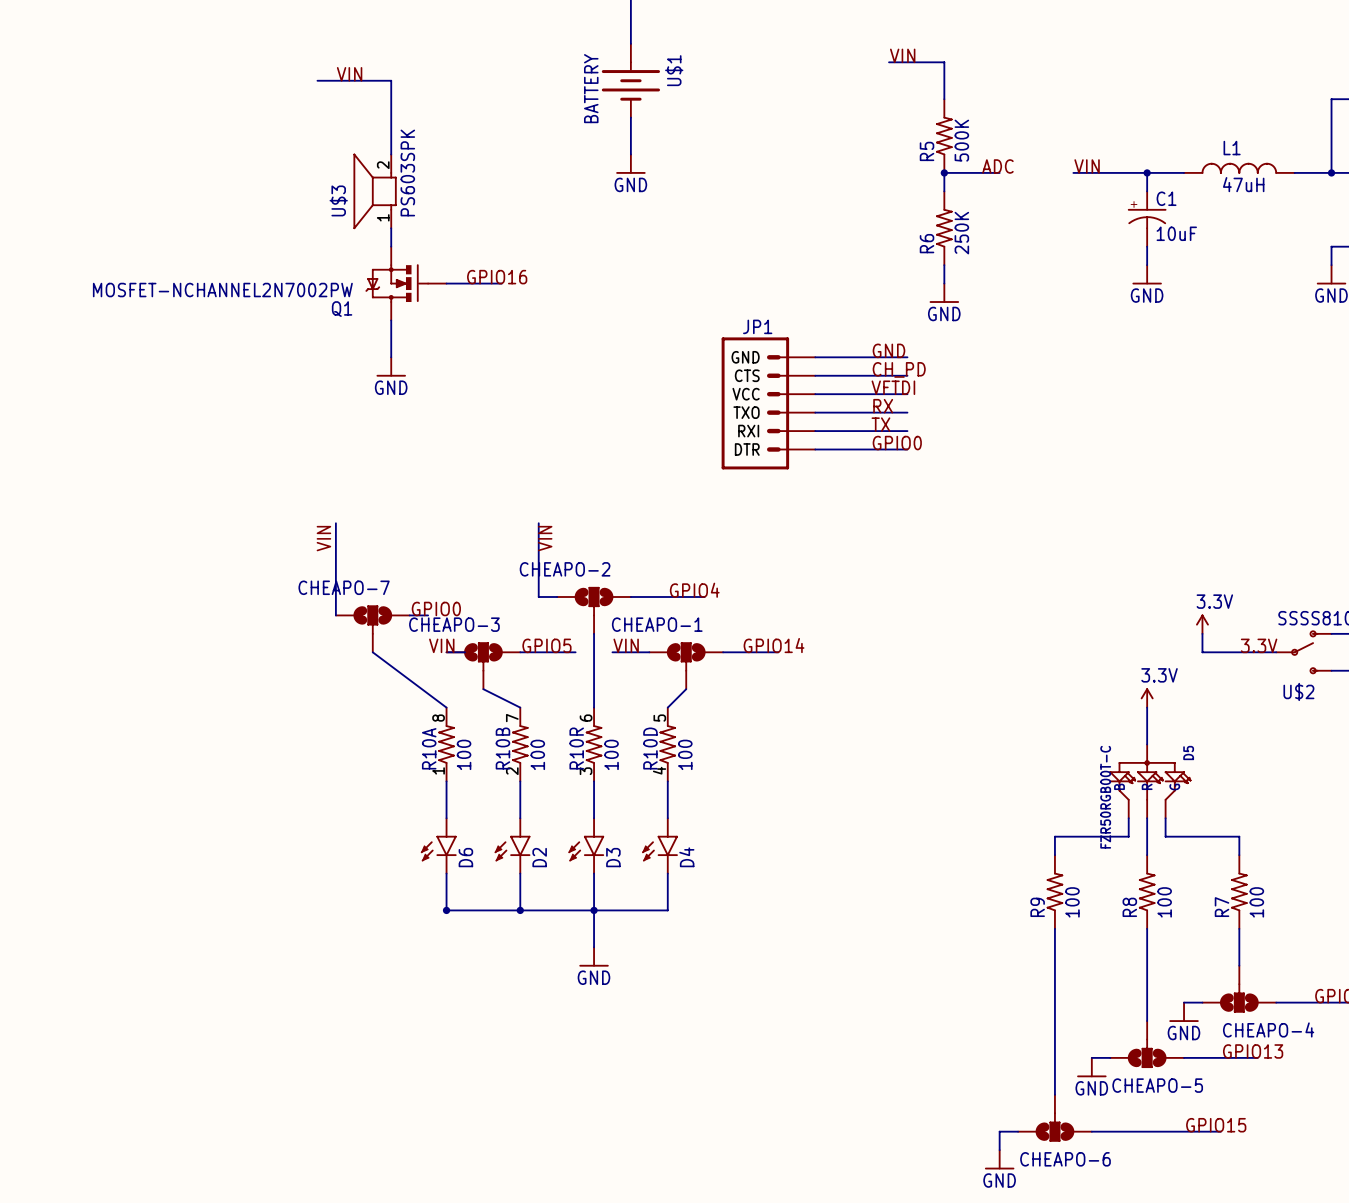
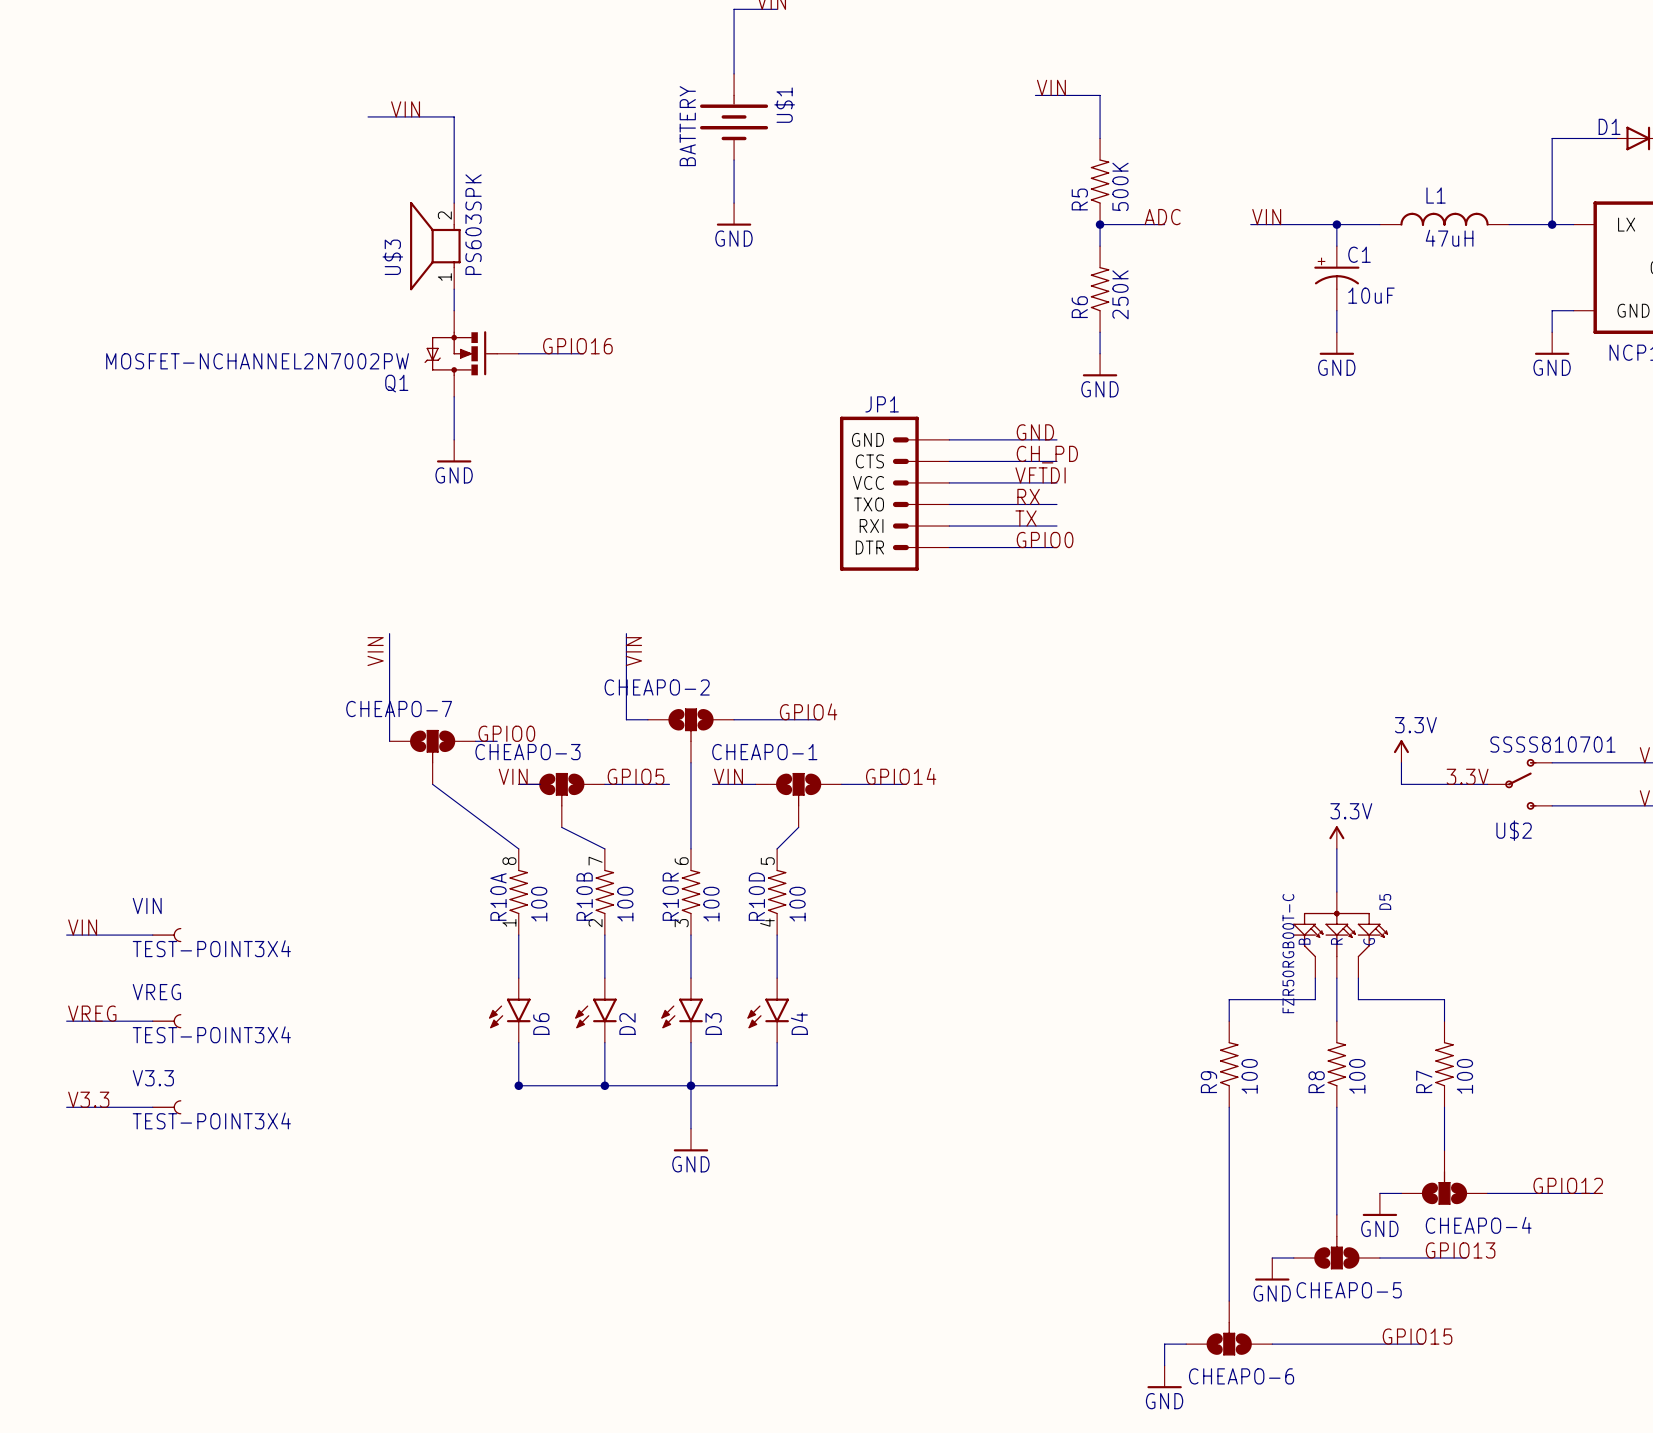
label: none -> VIN (82, 927)
wire: none -> (66, 935) (152, 935)
VIN: none -> TEST-POINT3X4 (166, 935)
label: none -> VREG (92, 1013)
wire: none -> (66, 1021) (152, 1021)
VREG: none -> TEST-POINT3X4 (166, 1021)
label: none -> V3.3 (88, 1099)
wire: none -> (66, 1107) (152, 1107)
V3.3: none -> TEST-POINT3X4 (166, 1107)

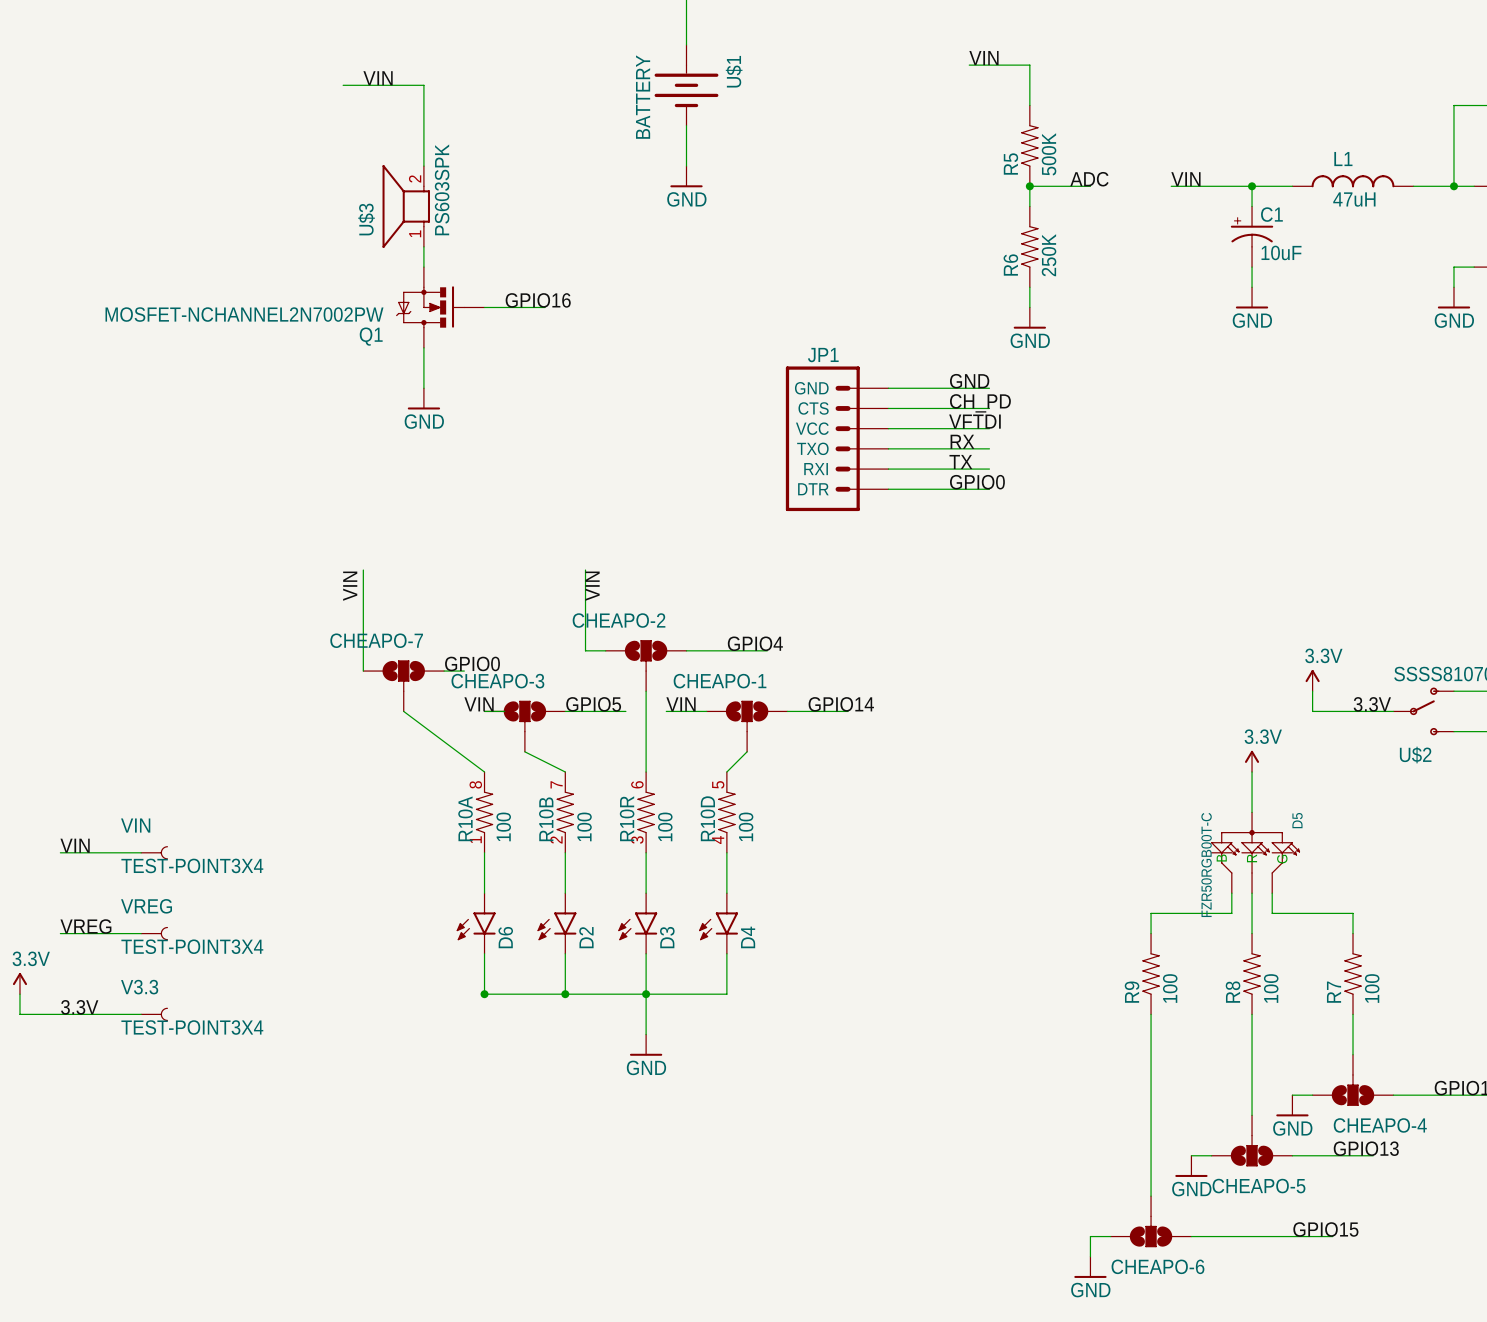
power symbol: none -> 3.3V (19, 983)
wire: none -> (19, 994) (19, 1014) (60, 1014)
label: V3.3 (88, 1099) -> 3.3V (79, 1007)

